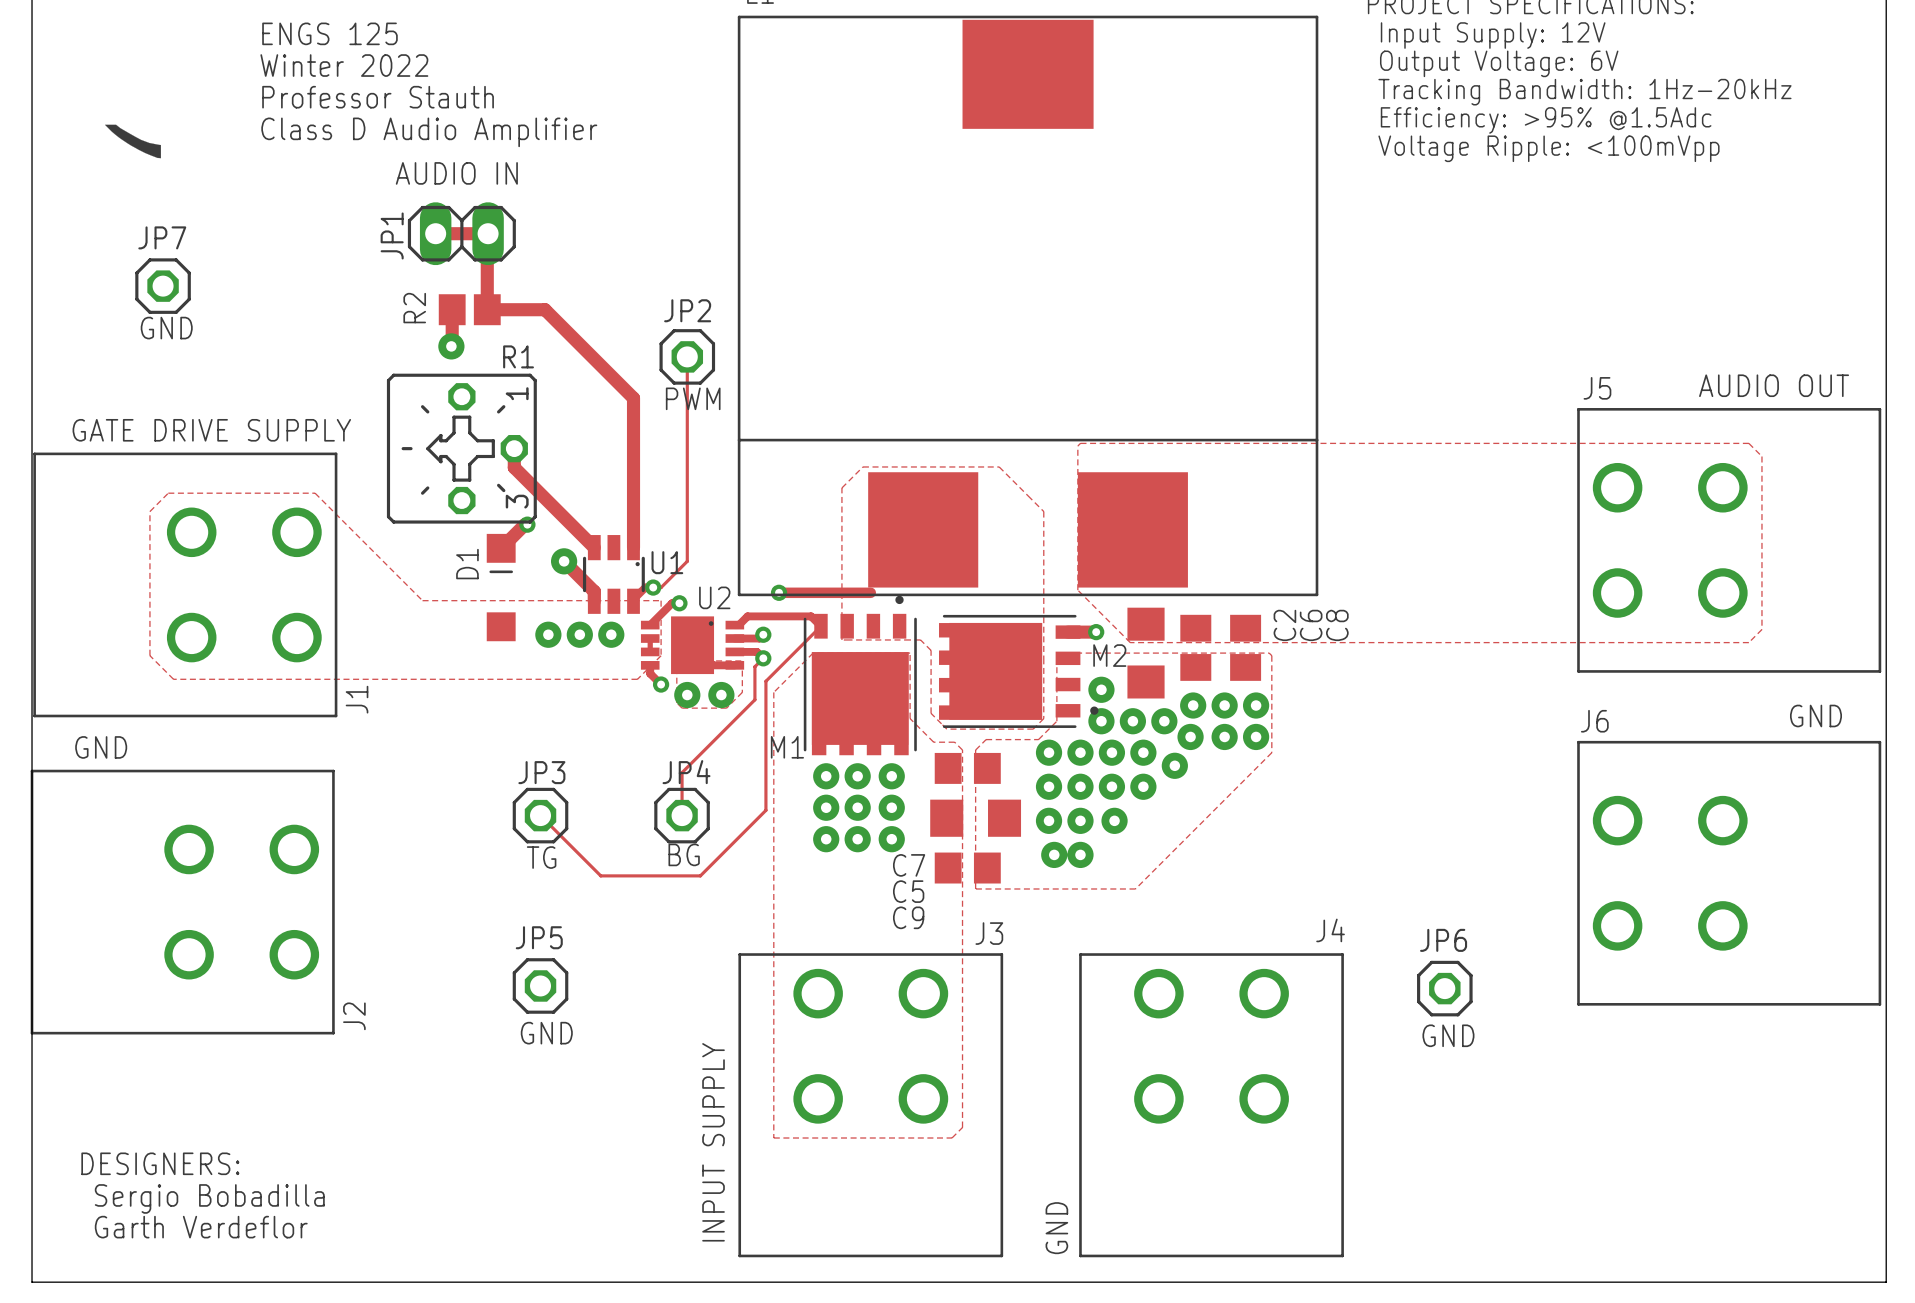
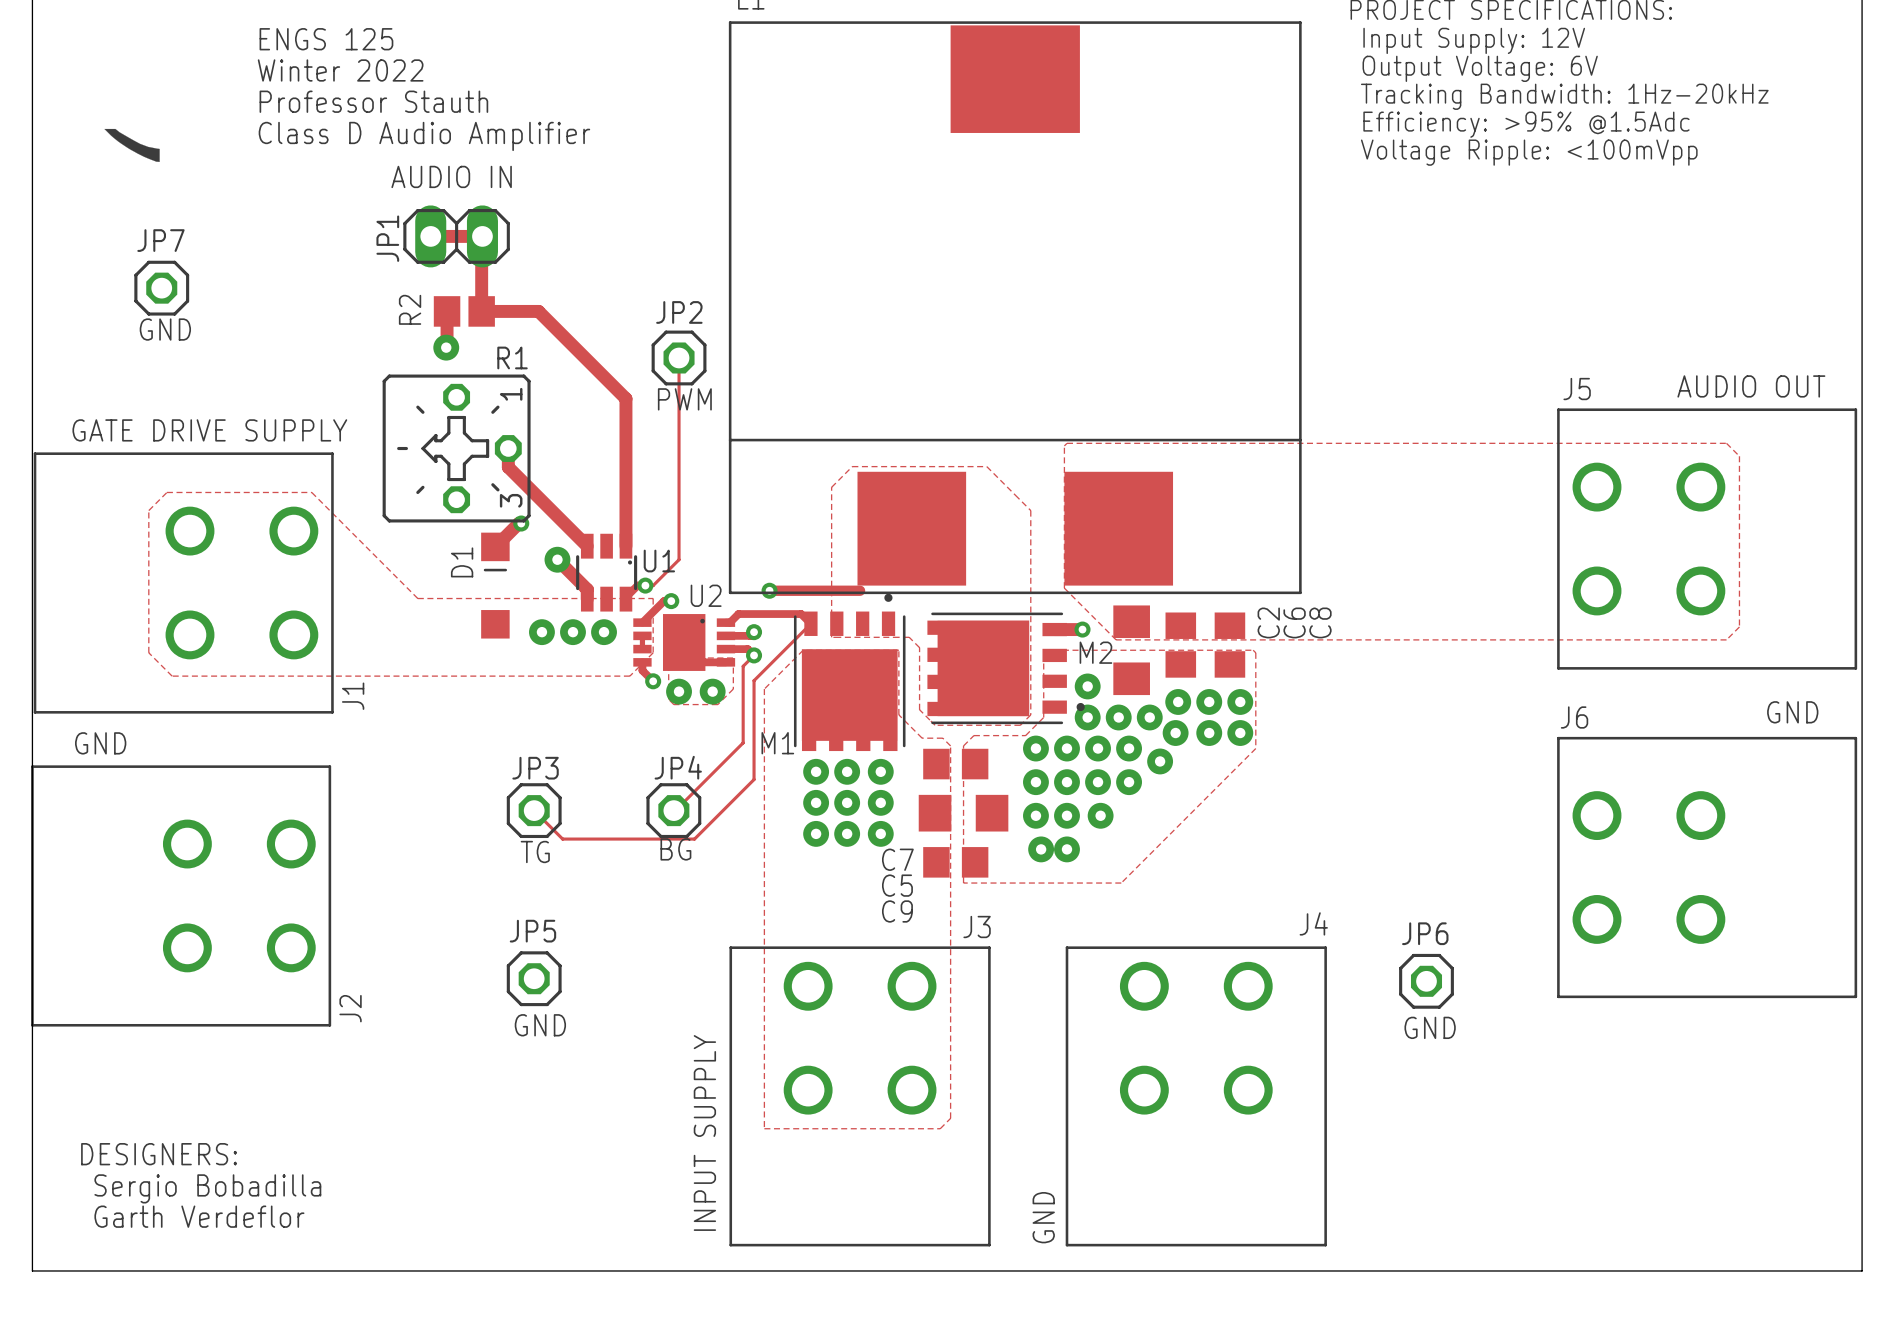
track: (754, 666) (754, 699) (682, 772) (682, 815) -> (745, 663) (743, 666) (743, 742) (673, 810)
track: (765, 681) (765, 810) (700, 875) (600, 875) (569, 844) -> (756, 678) (754, 680) (754, 779) (694, 839) (562, 839)

